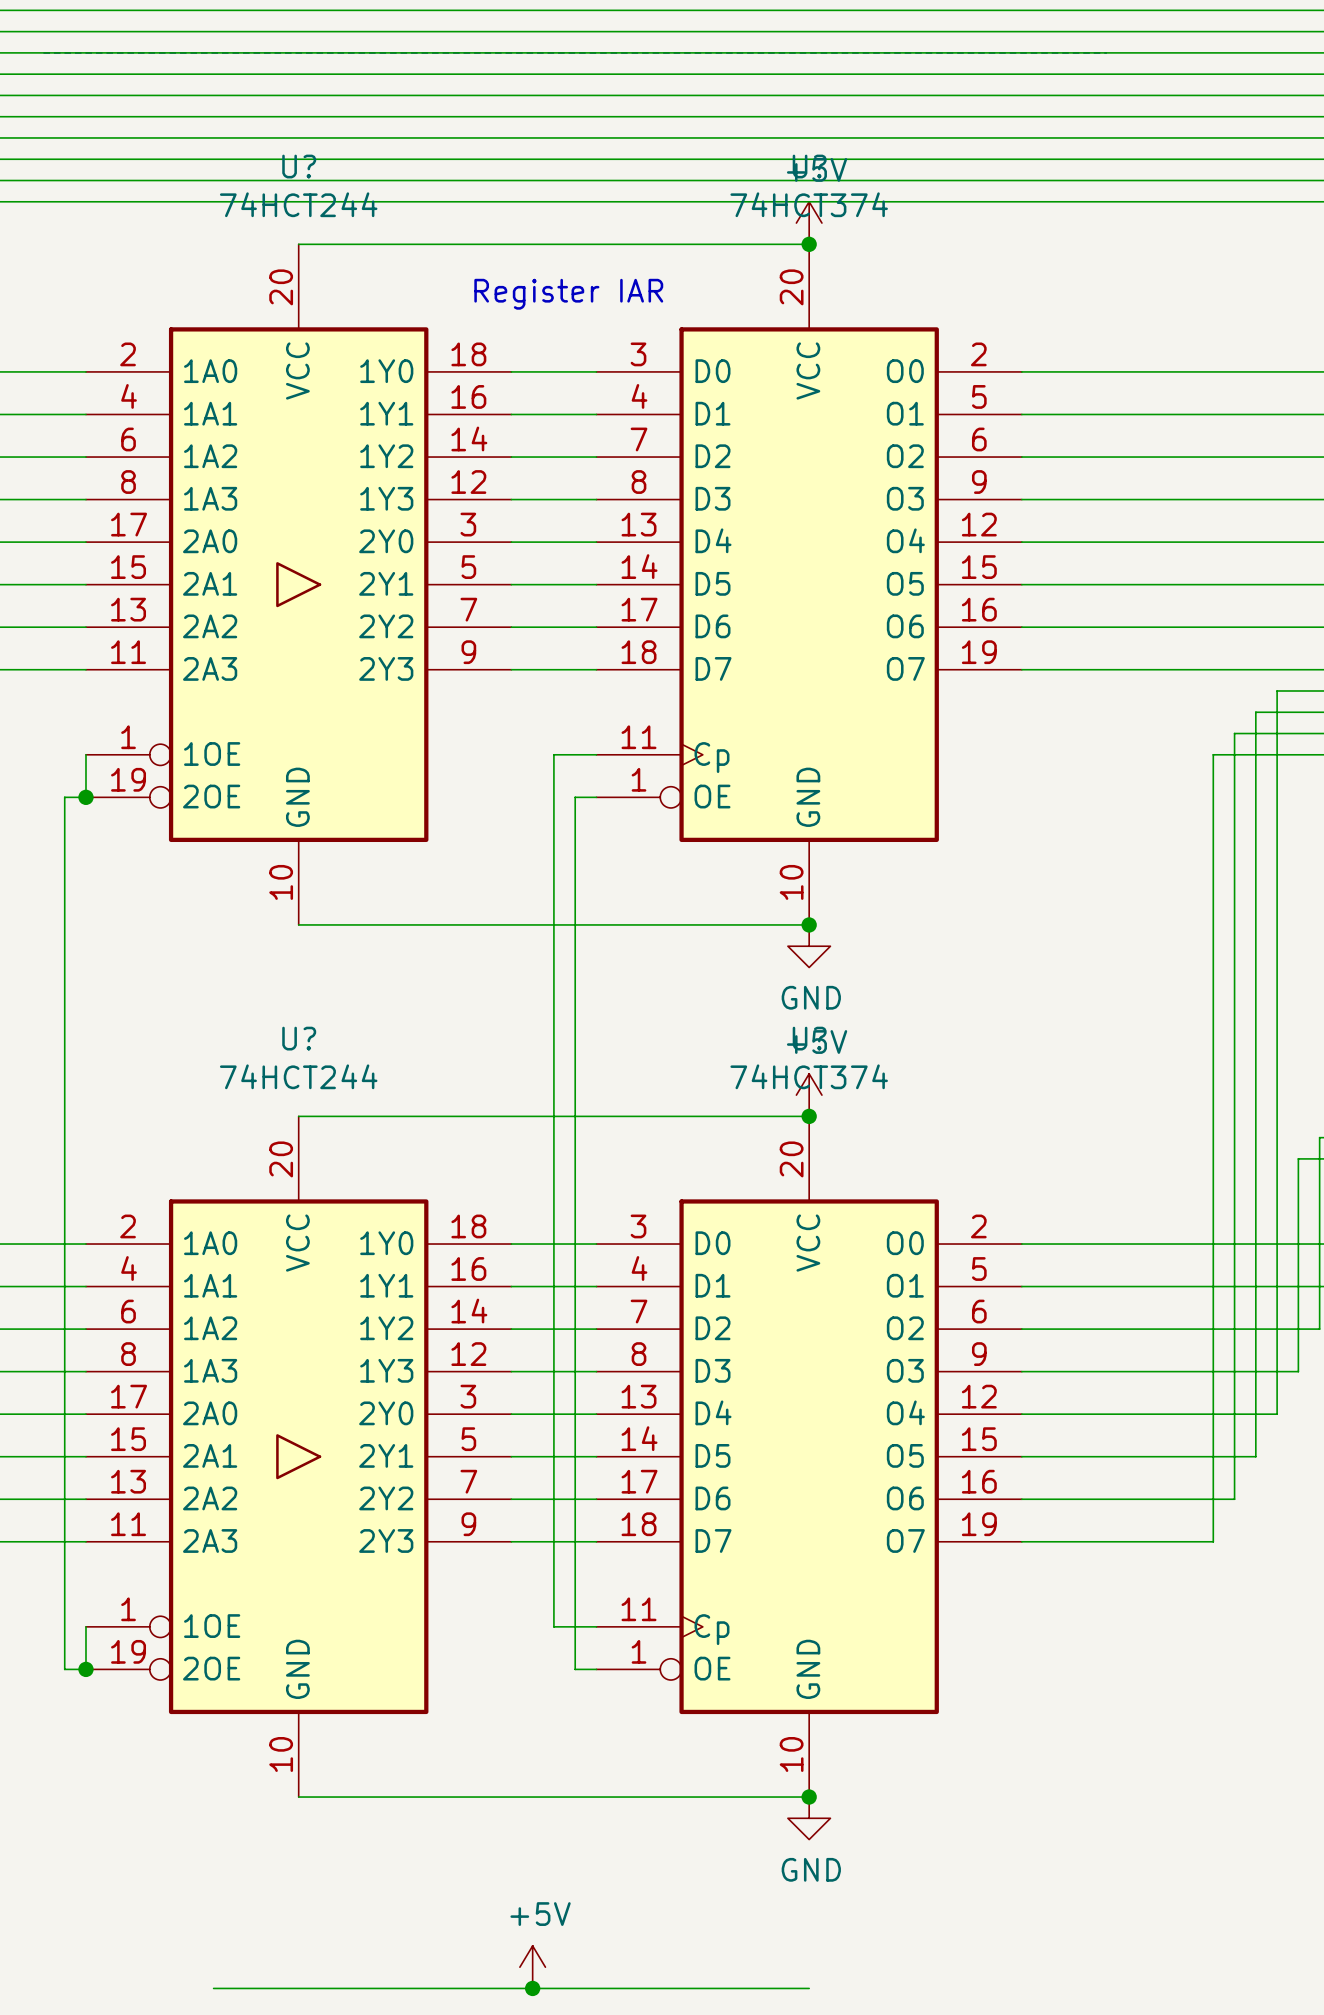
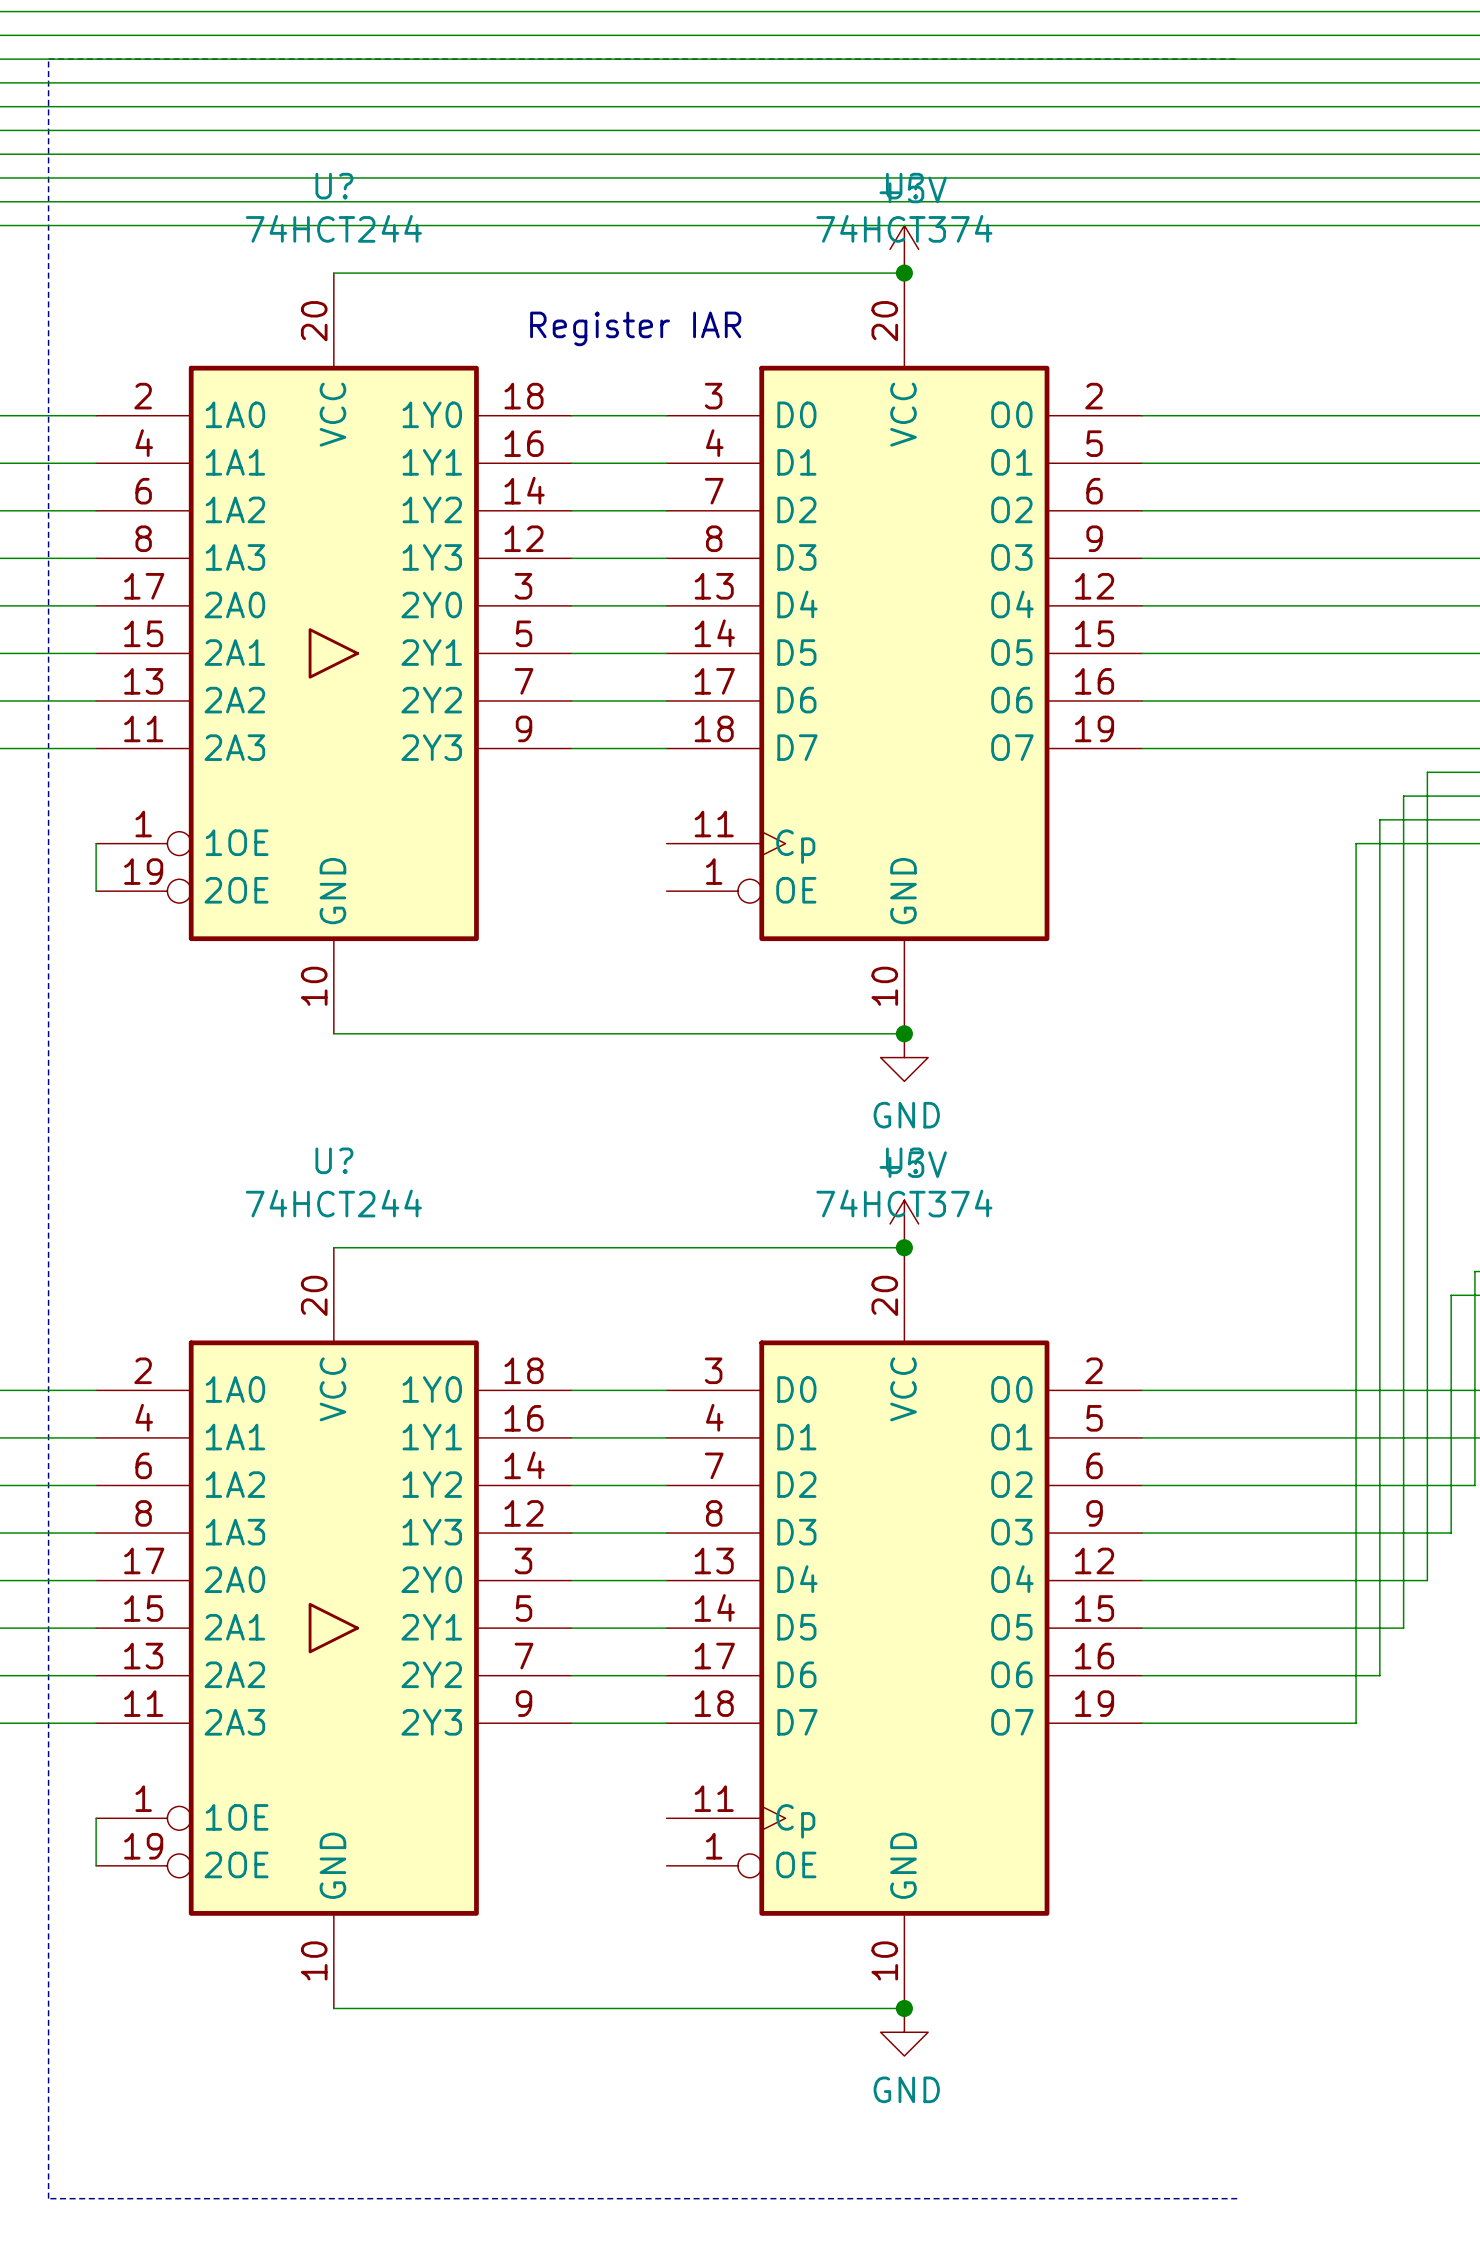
line: none -> (48, 59) (48, 2198) (1237, 2198)
wire: (596, 754) (553, 754) (553, 1626) (596, 1626) -> none
wire: (85, 797) (64, 797) (64, 1669) (85, 1669) -> none
junction: (85, 797) -> none
wire: (596, 797) (575, 797) (575, 1669) (596, 1669) -> none
junction: (85, 1669) -> none
power symbol: +5V (532, 1967) -> none
wire: (213, 1988) (809, 1988) -> none
junction: (532, 1988) -> none

